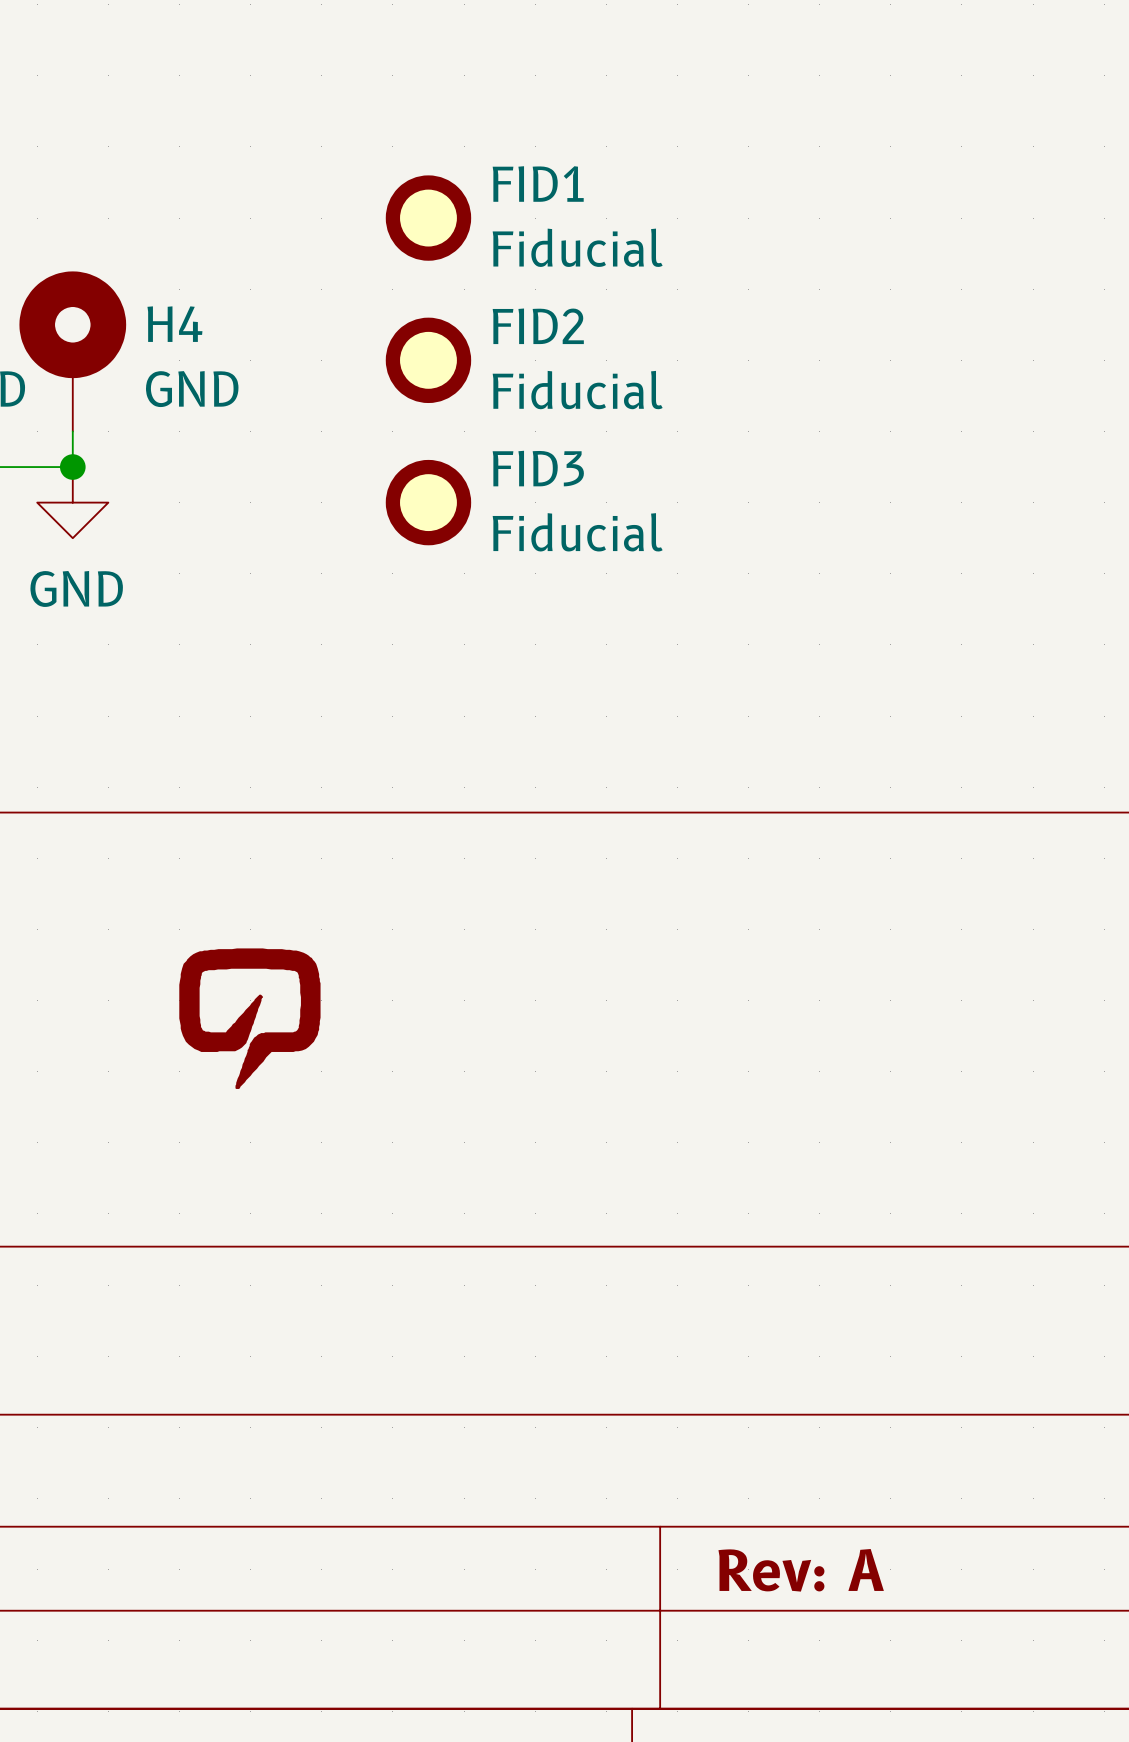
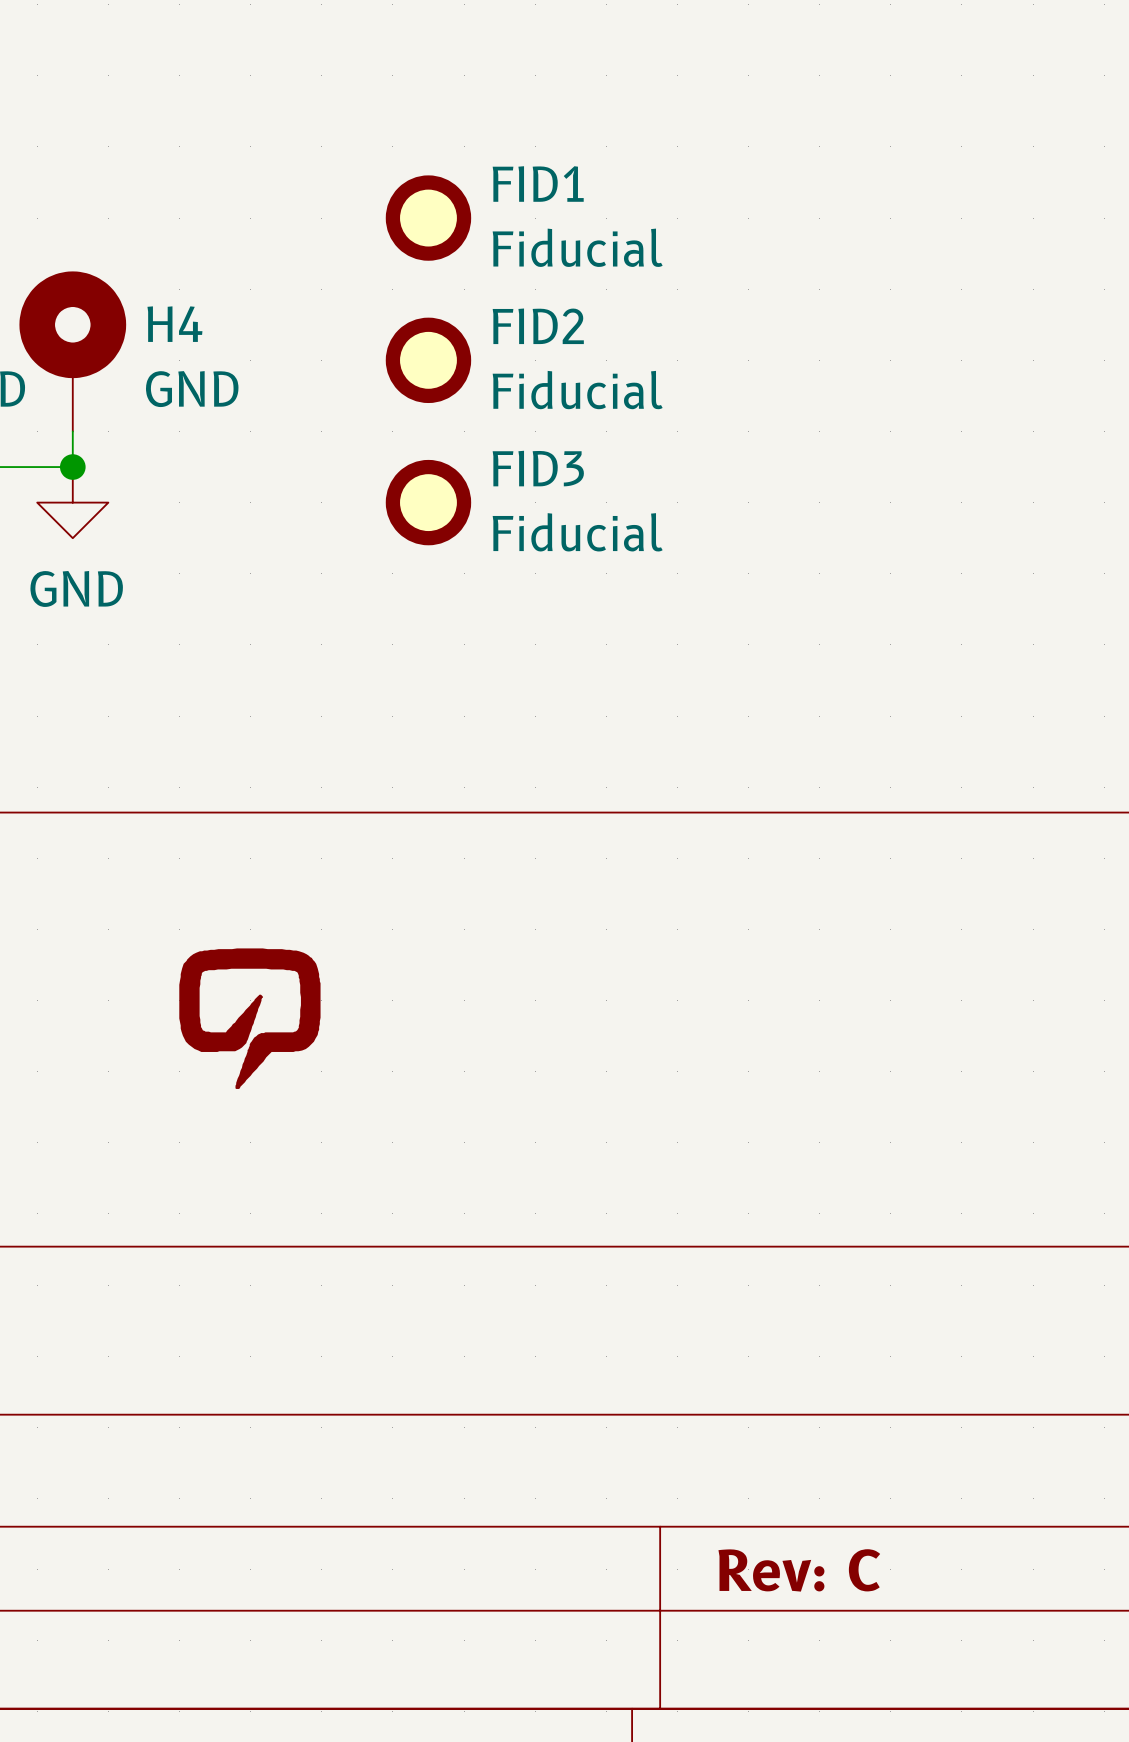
title block: Rev: A (801, 1570) -> Rev: C (799, 1570)

